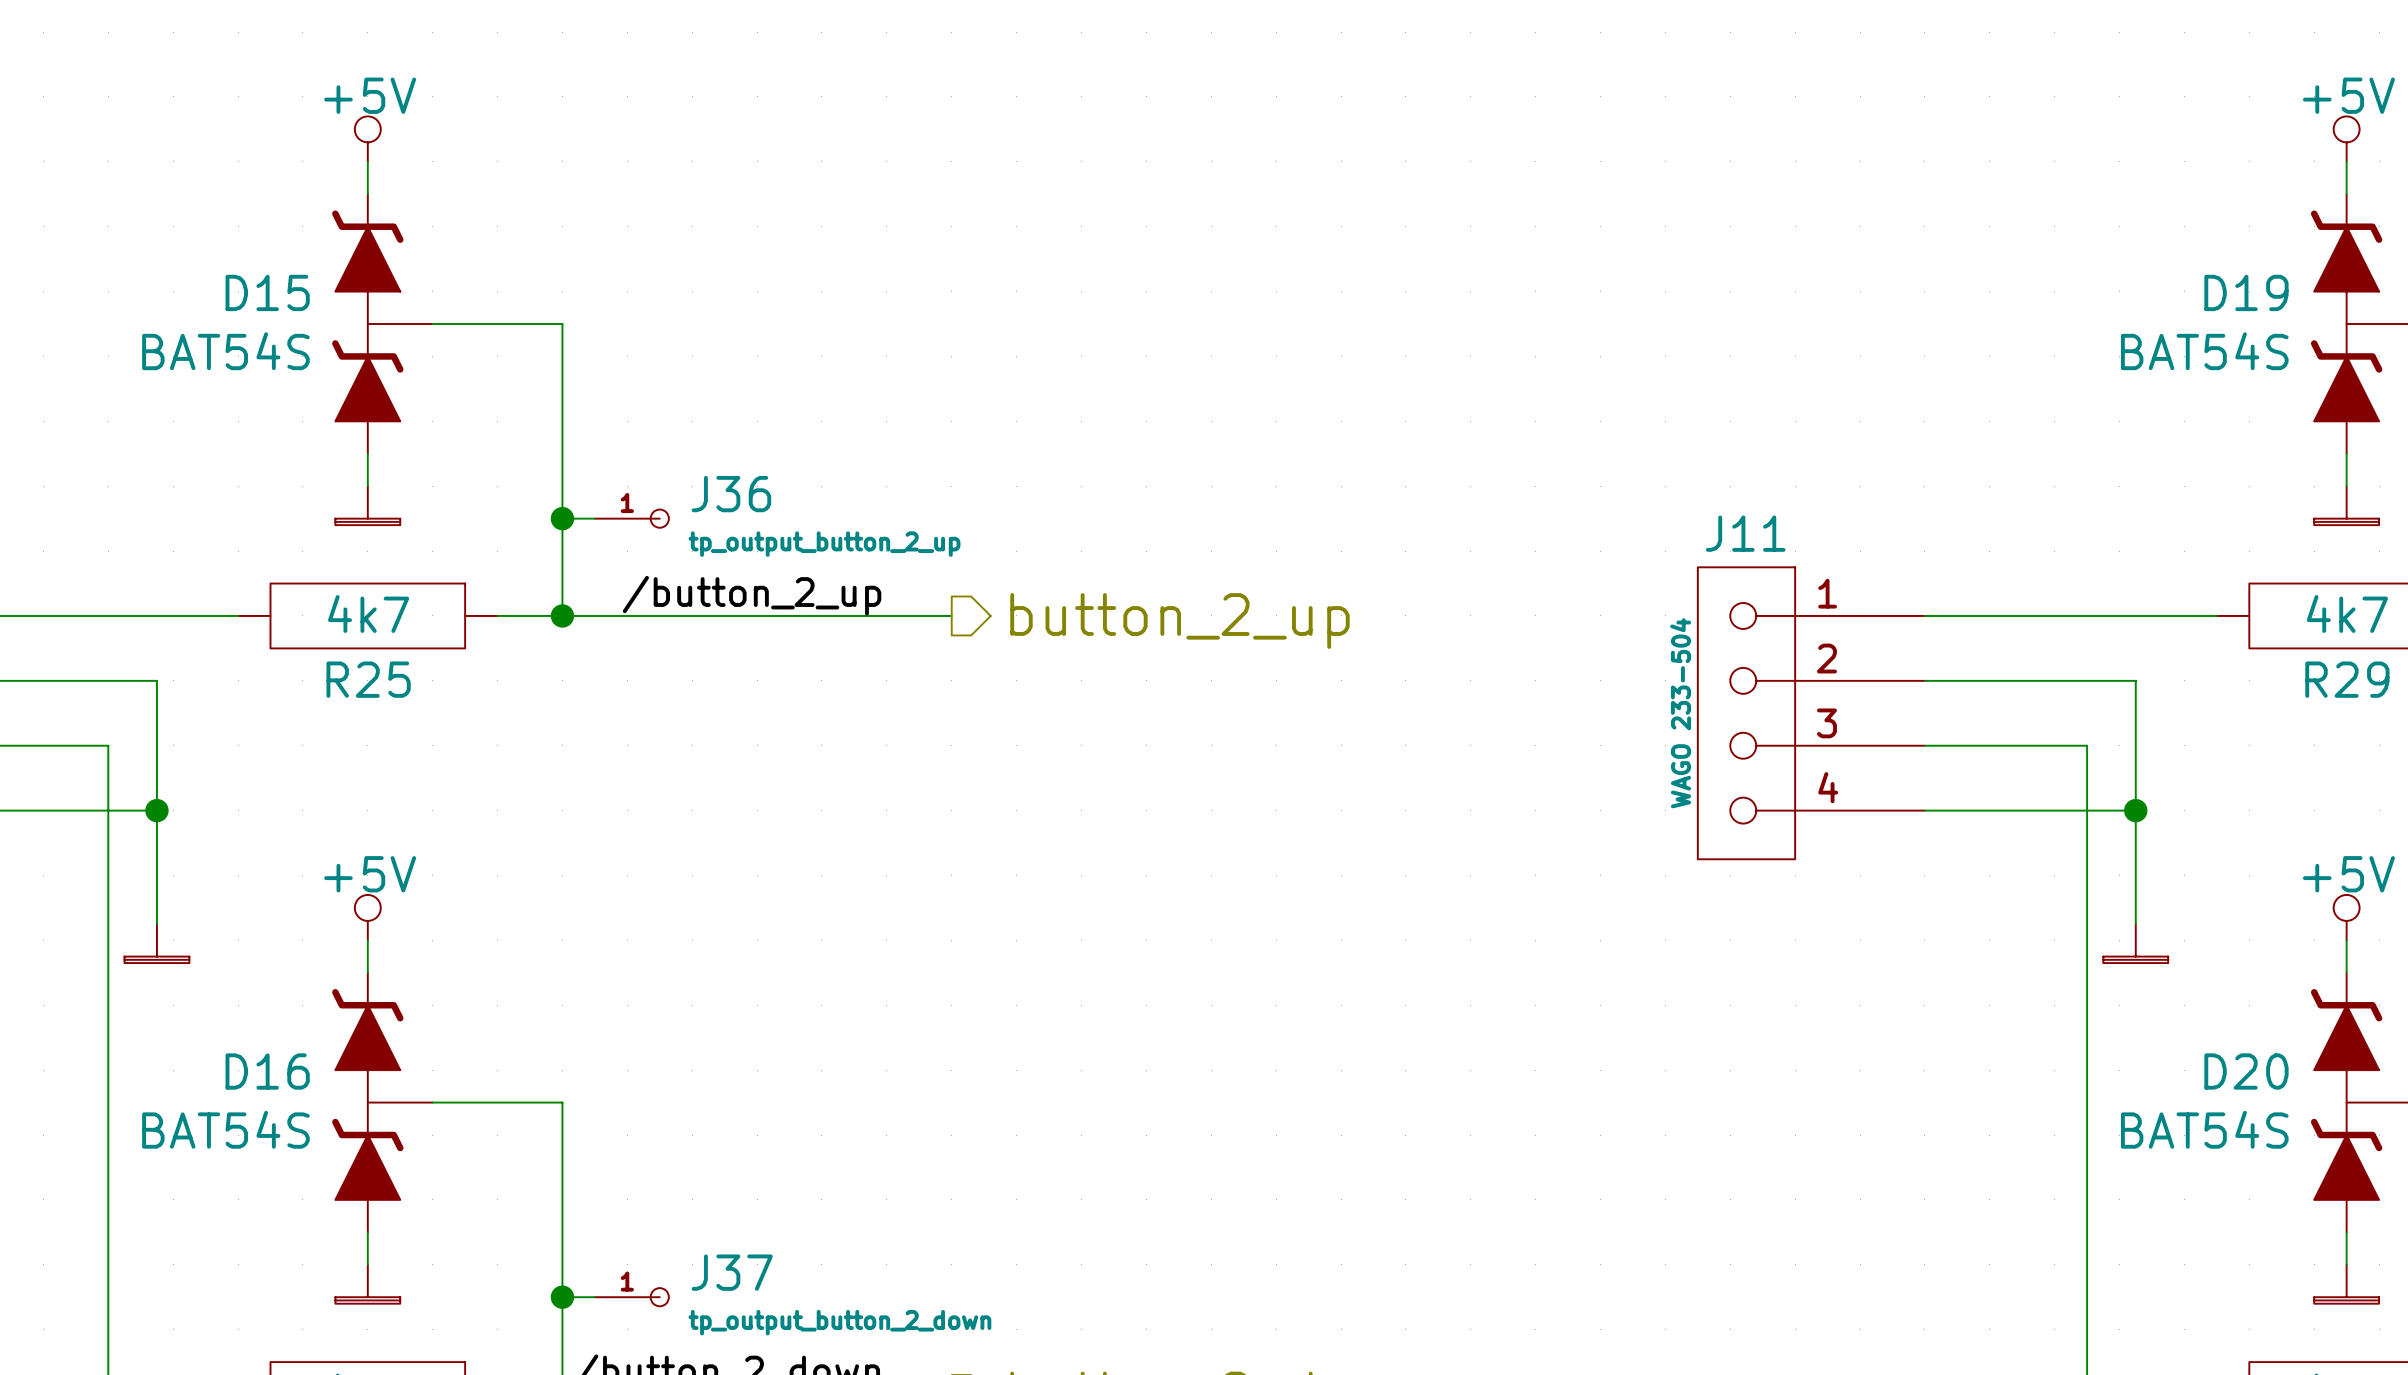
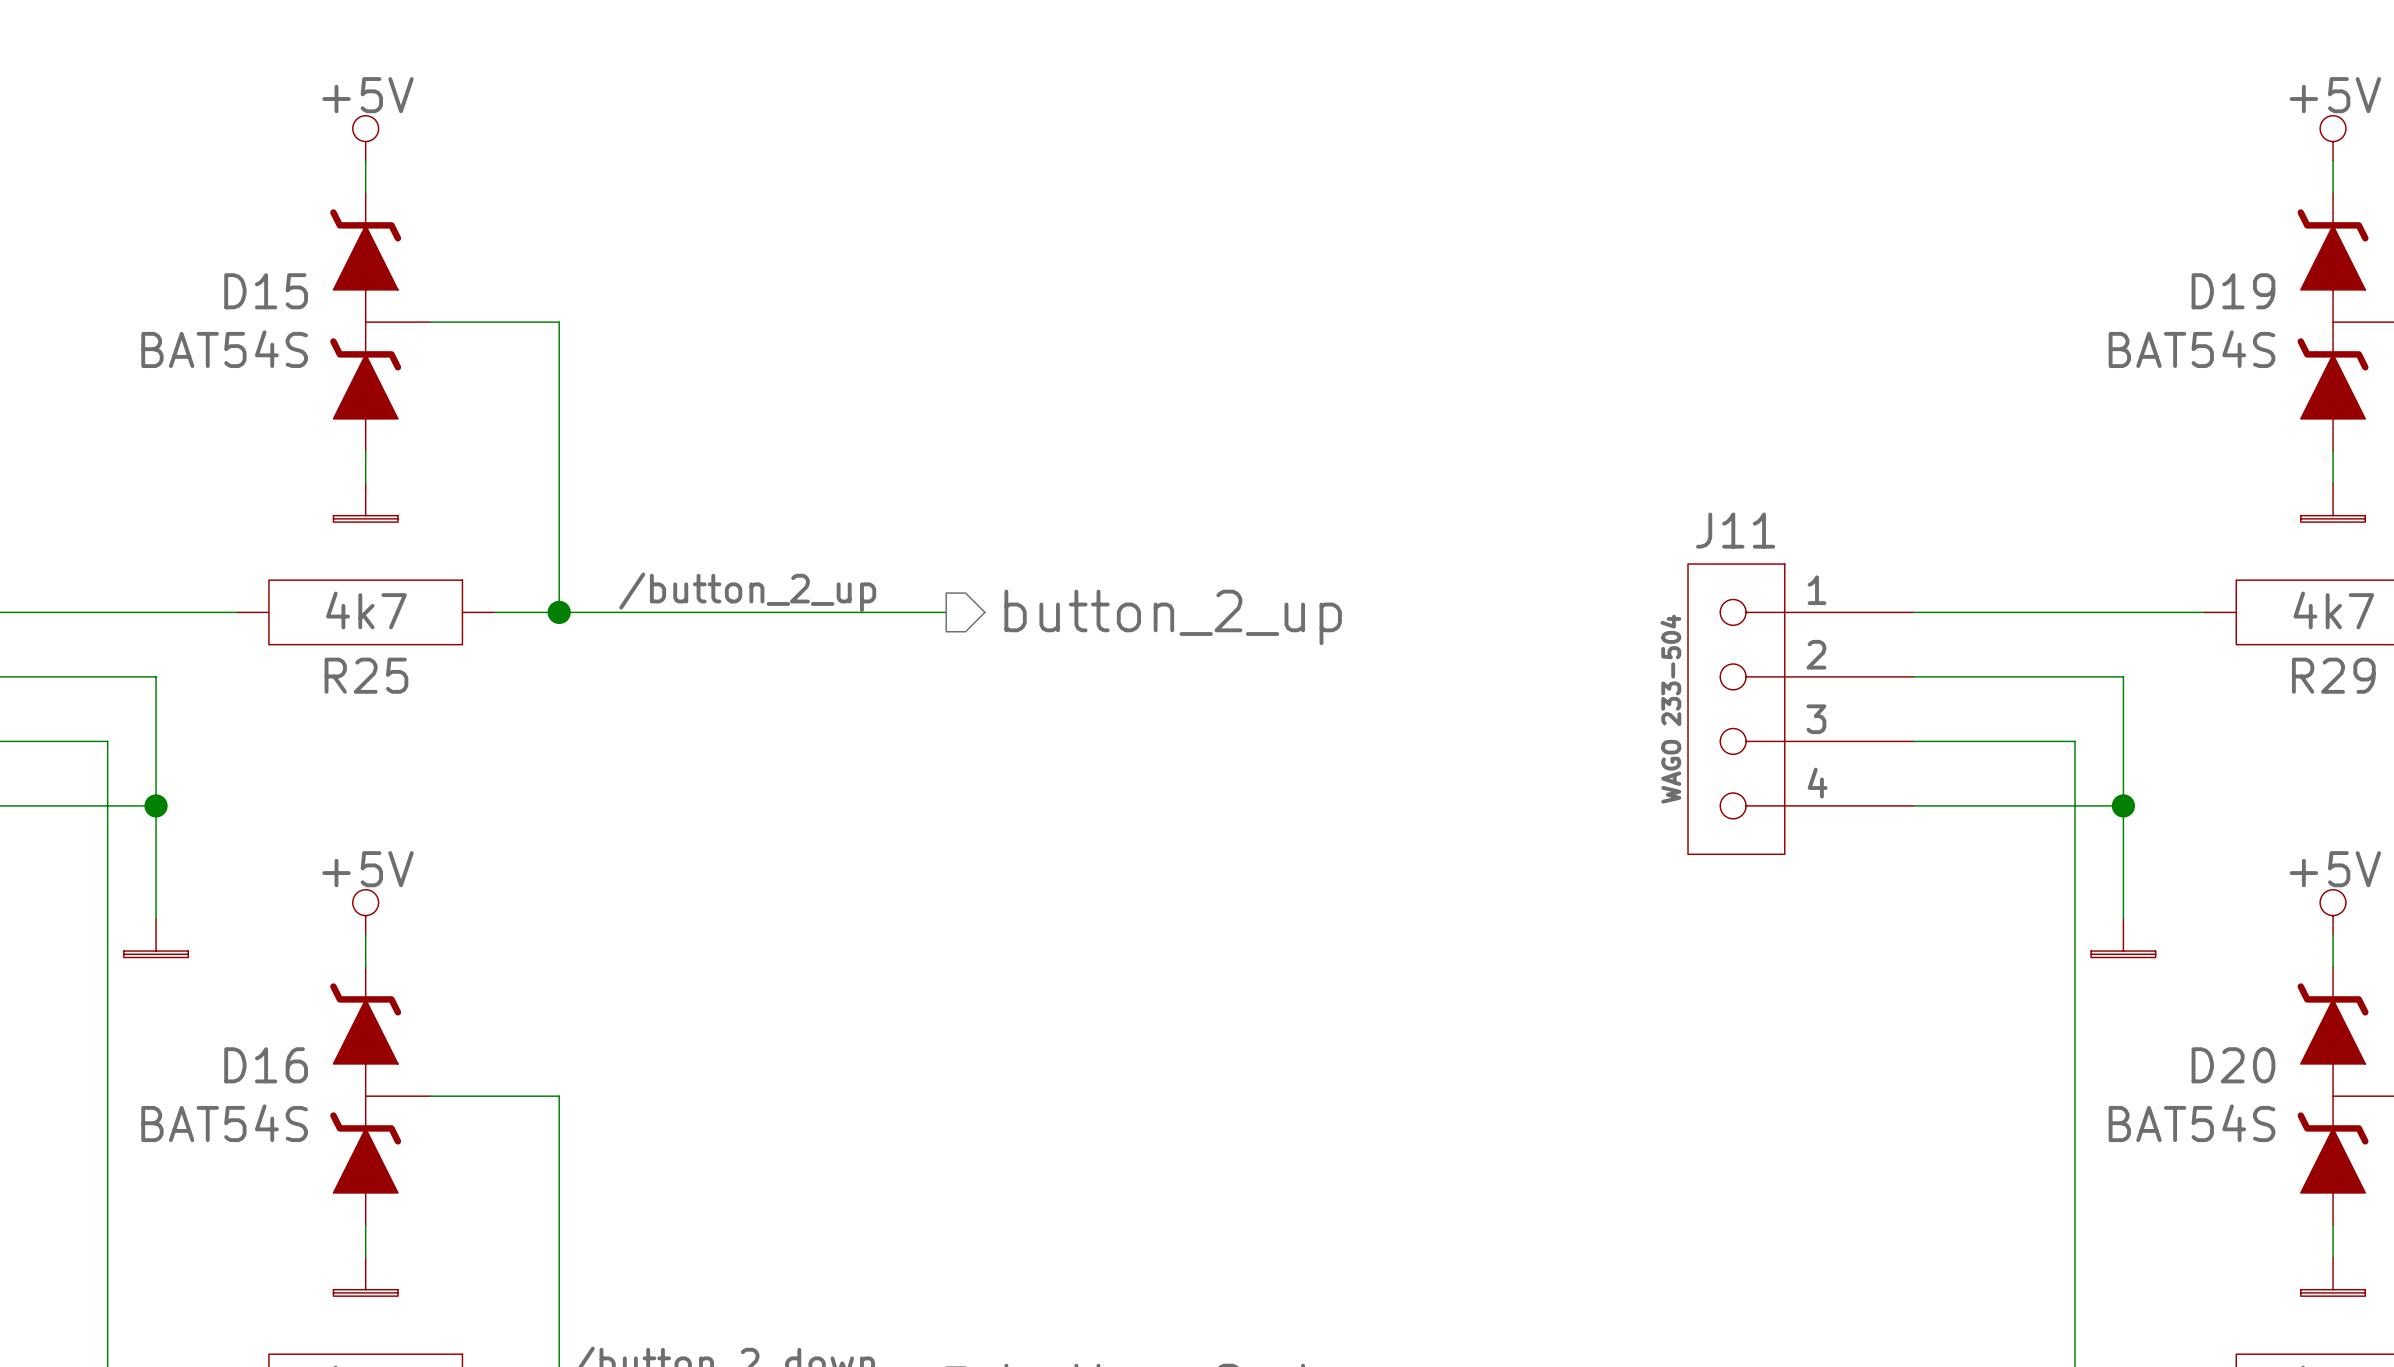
wire: (562, 518) (594, 518) -> none
junction: (562, 518) -> none
J36: tp_output_button_2_up (631, 518) -> none
wire: (562, 1297) (594, 1297) -> none
junction: (562, 1297) -> none
J37: tp_output_button_2_down (631, 1297) -> none

